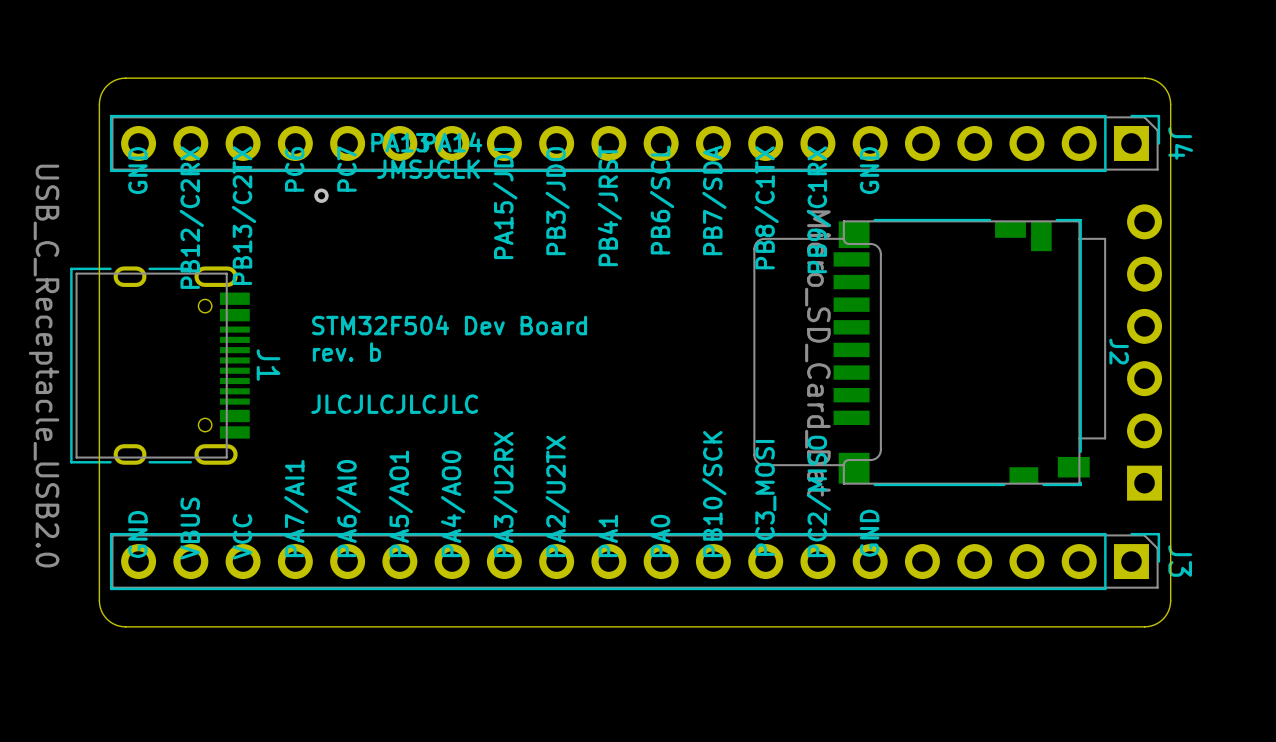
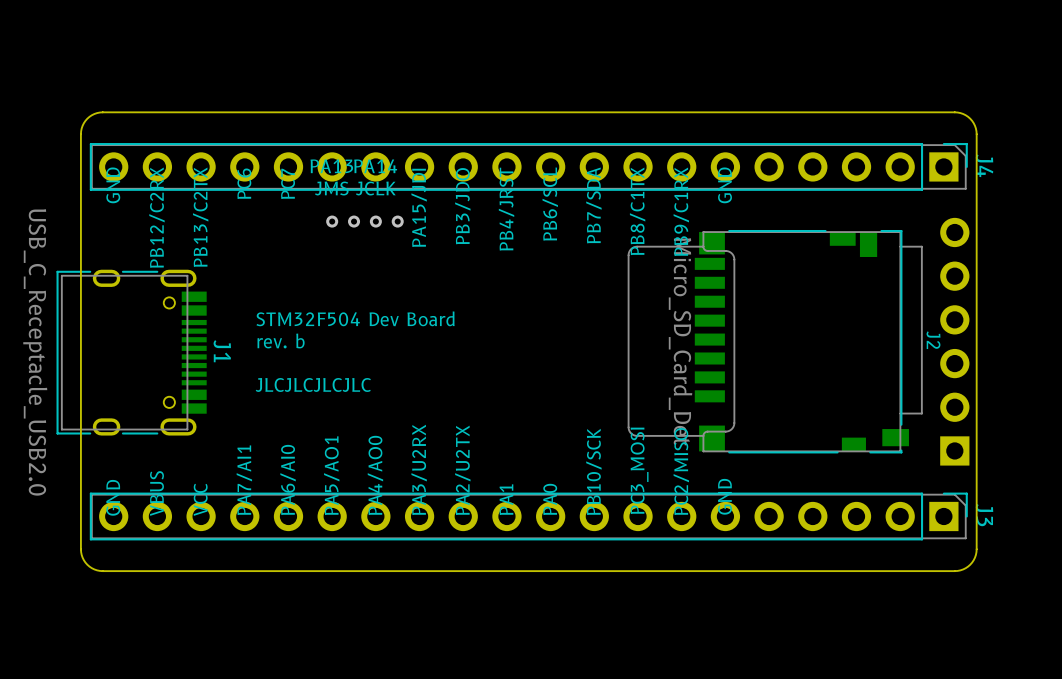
via: (321, 195) -> none
via: none -> (332, 221)
via: none -> (354, 221)
via: none -> (375, 221)
via: none -> (397, 221)

